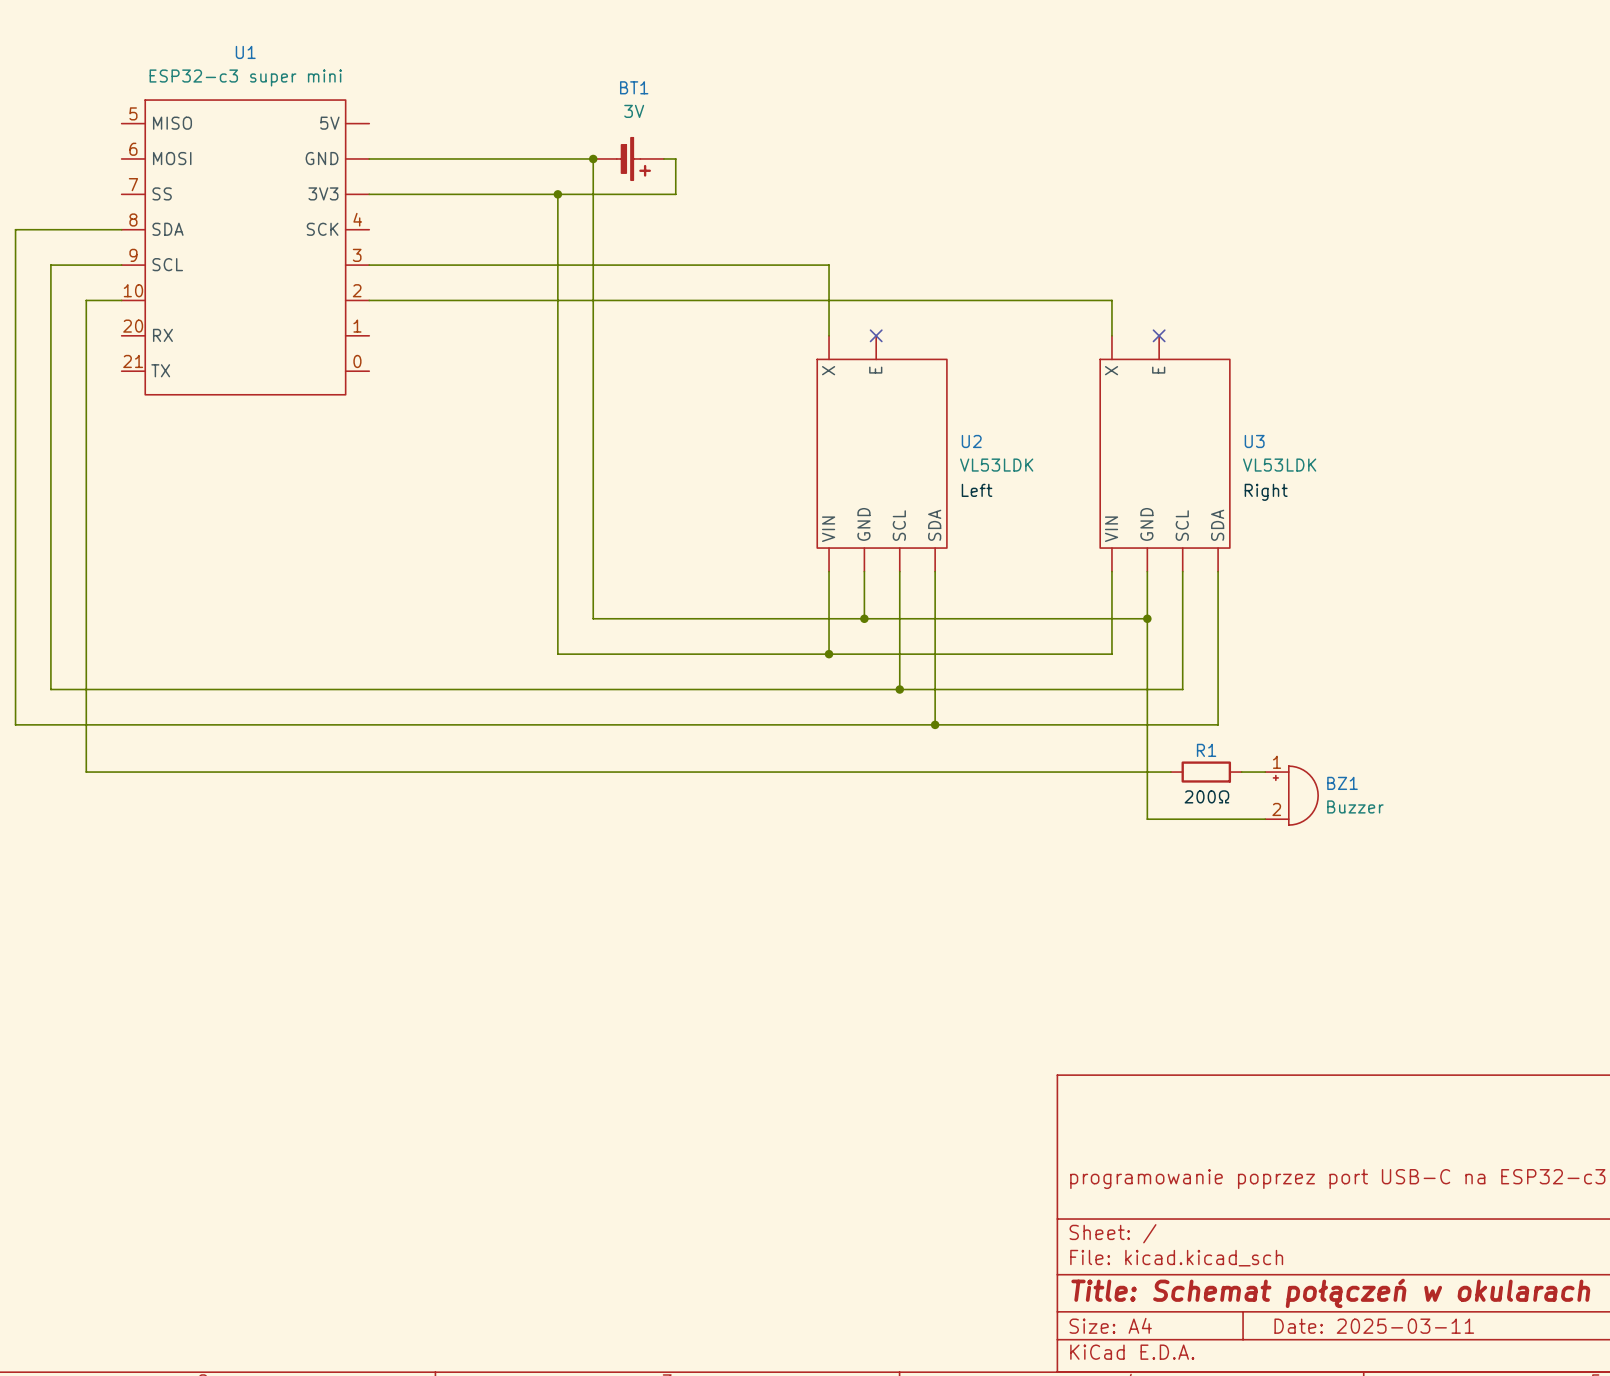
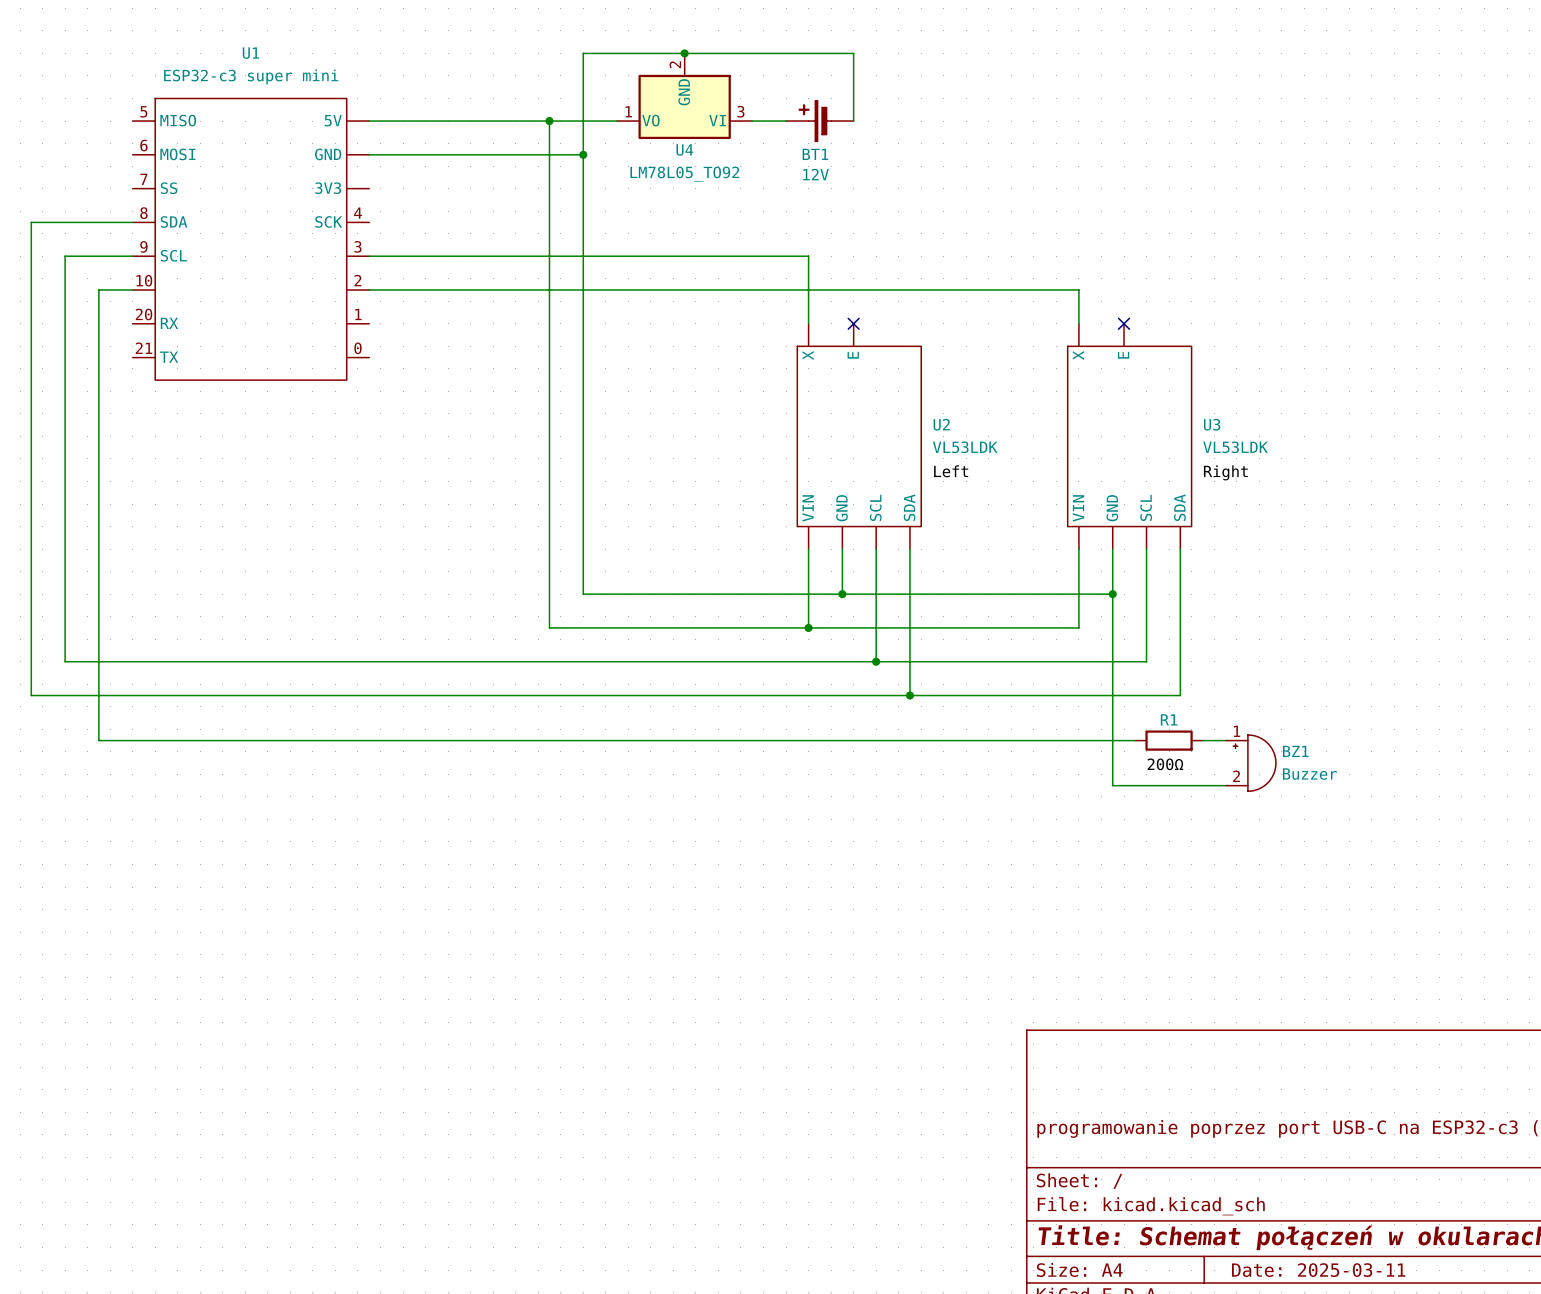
junction: none -> (684, 53)
BT1 name position: BT1 (634, 87) -> BT1 (815, 154)
U4: none -> LM78L05_TO92 (684, 96)
BT1 value: 3V (634, 111) -> 12V (816, 174)
wire: none -> (369, 121) (617, 121)
wire: none -> (549, 121) (549, 188)
junction: none -> (549, 121)
wire: none -> (752, 121) (786, 121)
wire: none -> (853, 121) (853, 53) (583, 53) (583, 154)
BT1 position: (628, 158) -> (819, 121)
BT1 rotation: 0° (633, 158) -> 180° (814, 121)
wire: (663, 158) (675, 158) (675, 194) (369, 194) -> none
junction: (557, 194) -> none

